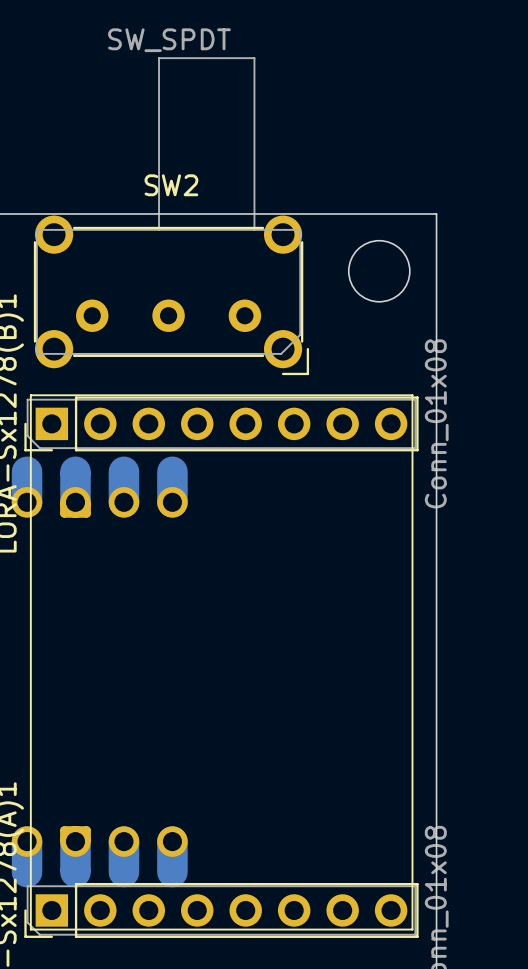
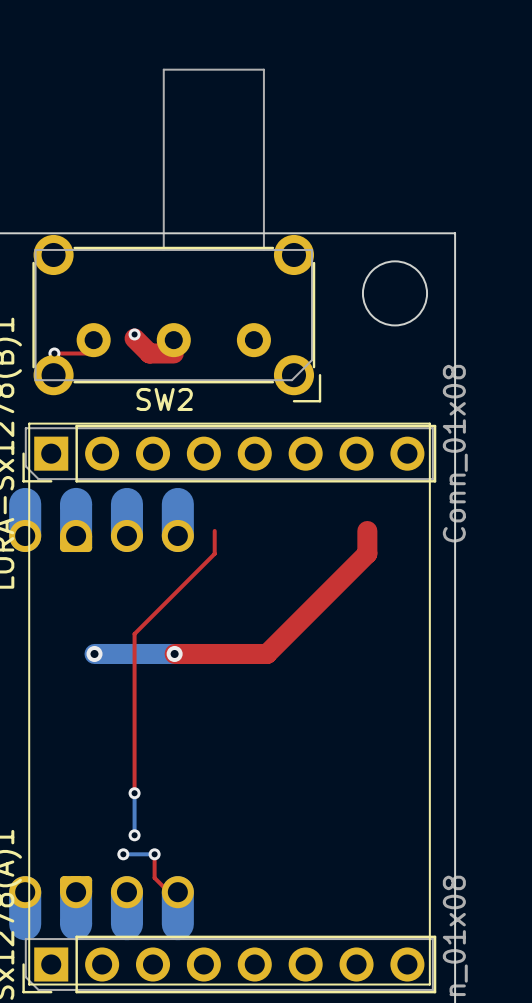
SW2 value: SW_SPDT (169, 40) -> none
SW2 name position: SW2 (171, 185) -> SW2 (164, 399)
via: none -> (134, 334)
top track: none -> (134, 338) (149, 353) (173, 353)
top track: none -> (54, 353) (93, 353)
via: none -> (54, 353)
top track: none -> (214, 530) (214, 553) (134, 633) (134, 793)
top track: none -> (367, 530) (367, 553) (267, 653) (174, 653)
bottom track: none -> (94, 653) (174, 653)
via: none -> (94, 653)
via: none -> (174, 653)
bottom track: none -> (134, 793) (134, 835)
via: none -> (134, 793)
via: none -> (134, 835)
via: none -> (123, 854)
top track: none -> (154, 854) (154, 877) (163, 887)
bottom track: none -> (154, 854) (123, 854) (126, 857)
via: none -> (154, 854)

